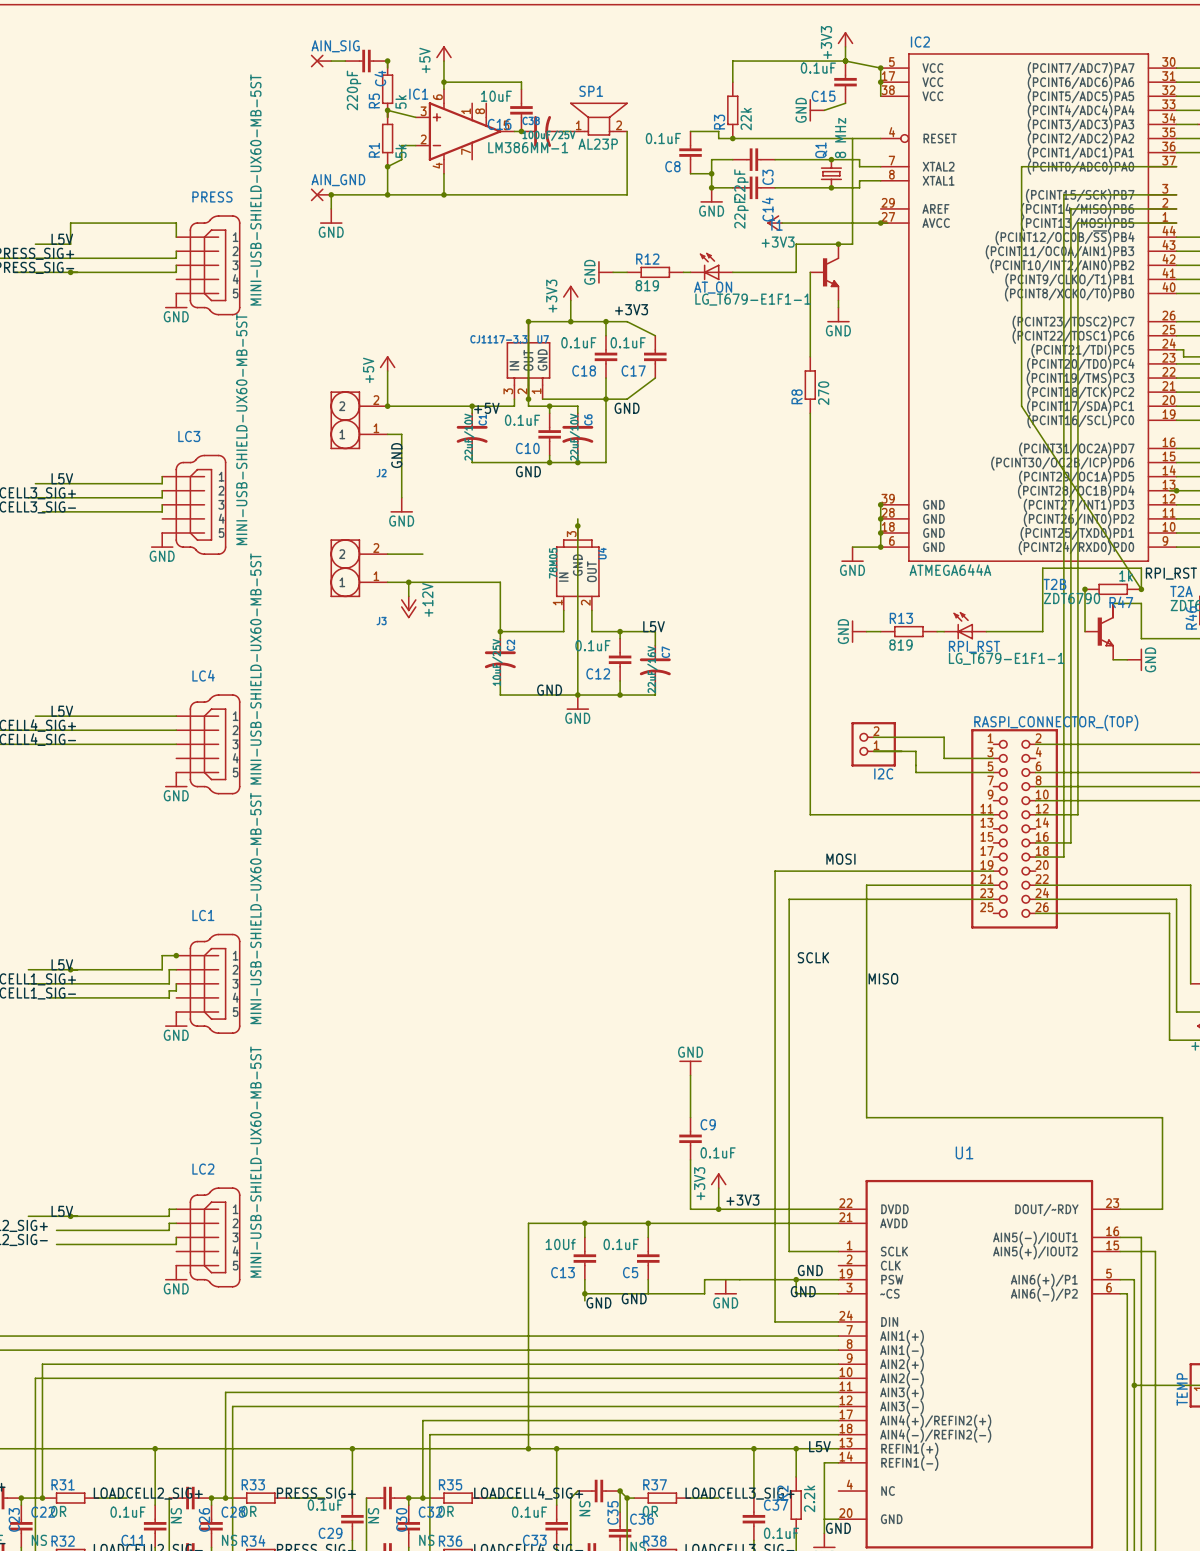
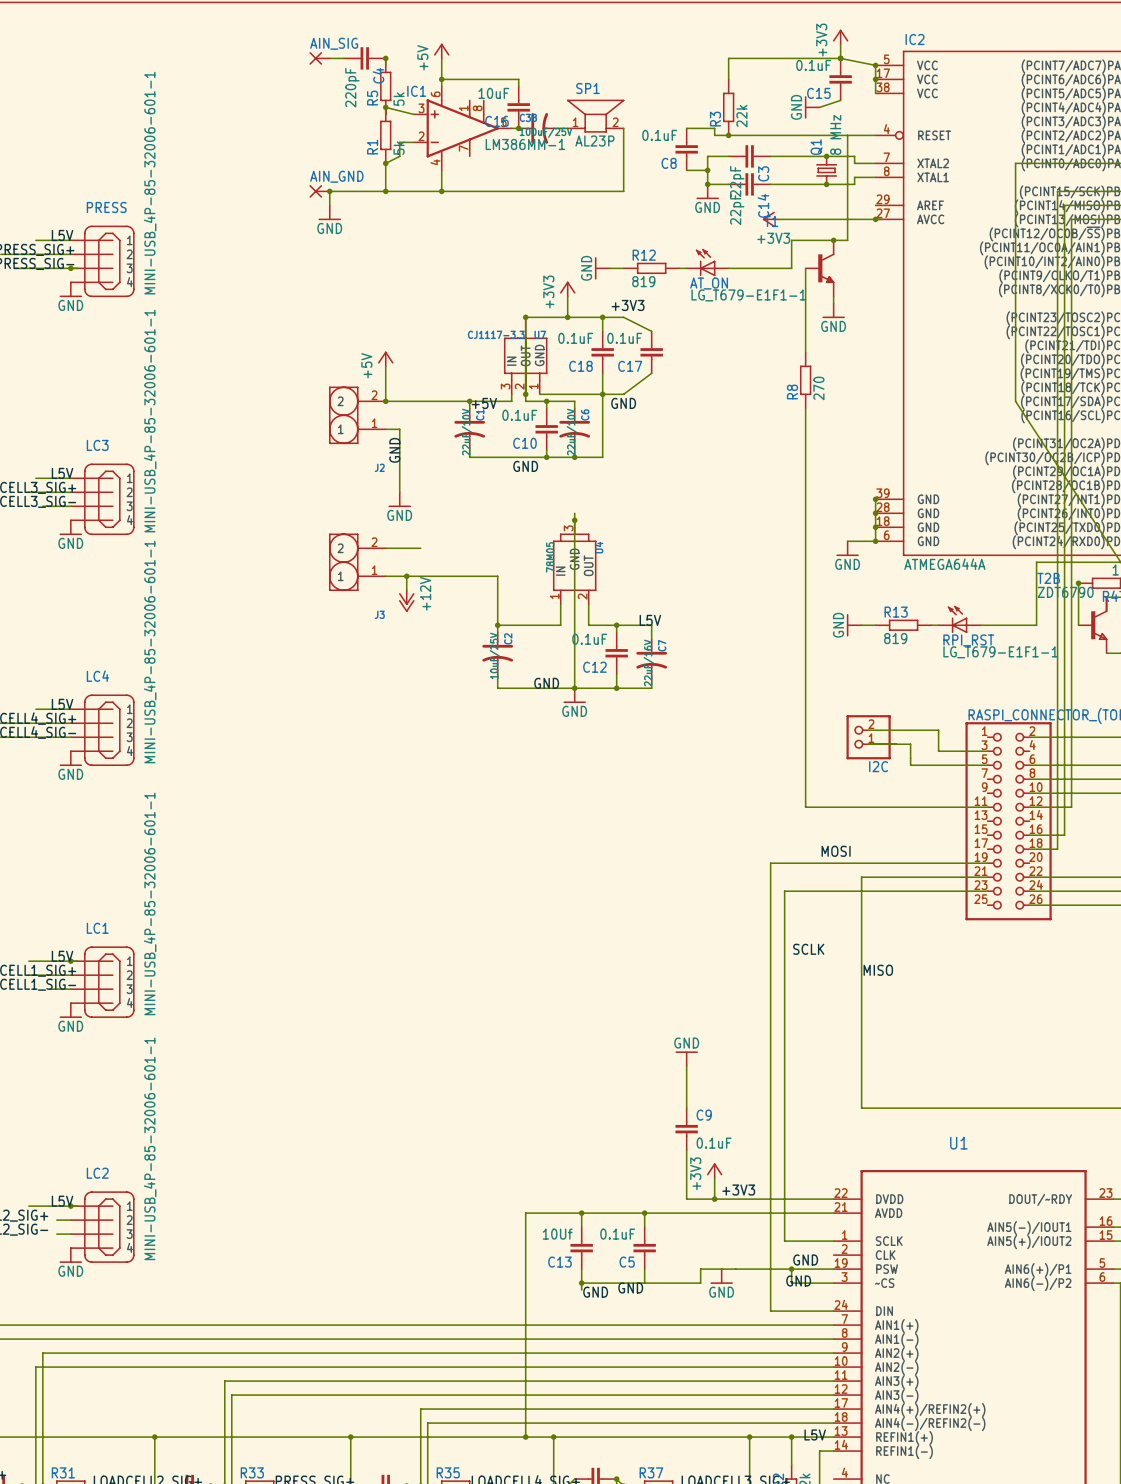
wire: (176, 237) (176, 223) (70, 223) (70, 244) -> none
wire: (176, 251) (176, 258) (70, 258) -> none
PRESS: none -> MINI-USB_4P-85-32006-601-1 (102, 261)
wire: (176, 265) (176, 272) (77, 272) -> none
PRESS: MINI-USB-SHIELD-UX60-MB-5ST (208, 265) -> none
power symbol position: GND (176, 300) -> GND (70, 289)
LC3 value: MINI-USB-SHIELD-UX60-MB-5ST (241, 429) -> MINI-USB_4P-85-32006-601-1 (150, 421)
LC3 name position: LC3 (189, 436) -> LC3 (97, 445)
LC3 symbol: [162, 454, 227, 555] -> [70, 463, 135, 535]
wire: (162, 476) (162, 483) (70, 483) -> none
wire: (162, 490) (162, 497) (70, 497) -> none
wire: (162, 504) (162, 511) (70, 511) -> none
power symbol position: GND (162, 540) -> GND (70, 527)
LC4 value: MINI-USB-SHIELD-UX60-MB-5ST (255, 668) -> MINI-USB_4P-85-32006-601-1 (150, 651)
LC4 name position: LC4 (203, 675) -> LC4 (97, 676)
LC4 symbol: [176, 694, 241, 795] -> [70, 694, 135, 766]
wire: (70, 716) (176, 716) -> none
wire: (70, 730) (176, 730) -> none
wire: (70, 744) (176, 744) -> none
power symbol position: GND (176, 779) -> GND (70, 758)
LC1 value: MINI-USB-SHIELD-UX60-MB-5ST (255, 908) -> MINI-USB_4P-85-32006-601-1 (150, 903)
LC1 name position: LC1 (203, 915) -> LC1 (97, 928)
LC1 symbol: [176, 933, 241, 1034] -> [70, 946, 135, 1018]
wire: (176, 955) (162, 955) (162, 969) (77, 969) -> none
junction: (176, 955) -> none
wire: (176, 969) (169, 969) (169, 983) (70, 983) -> none
wire: (176, 983) (176, 990) (169, 990) (169, 997) (70, 997) -> none
power symbol position: GND (176, 1019) -> GND (70, 1010)
LC2 value: MINI-USB-SHIELD-UX60-MB-5ST (255, 1162) -> MINI-USB_4P-85-32006-601-1 (150, 1148)
LC2 name position: LC2 (203, 1169) -> LC2 (97, 1173)
LC2 symbol: [176, 1187, 241, 1288] -> [70, 1191, 135, 1263]
wire: (176, 1209) (169, 1209) (169, 1216) (77, 1216) -> none
wire: (176, 1223) (169, 1223) (169, 1230) (70, 1230) -> none
wire: (176, 1237) (176, 1244) (70, 1244) -> none
power symbol position: GND (176, 1273) -> GND (70, 1255)

